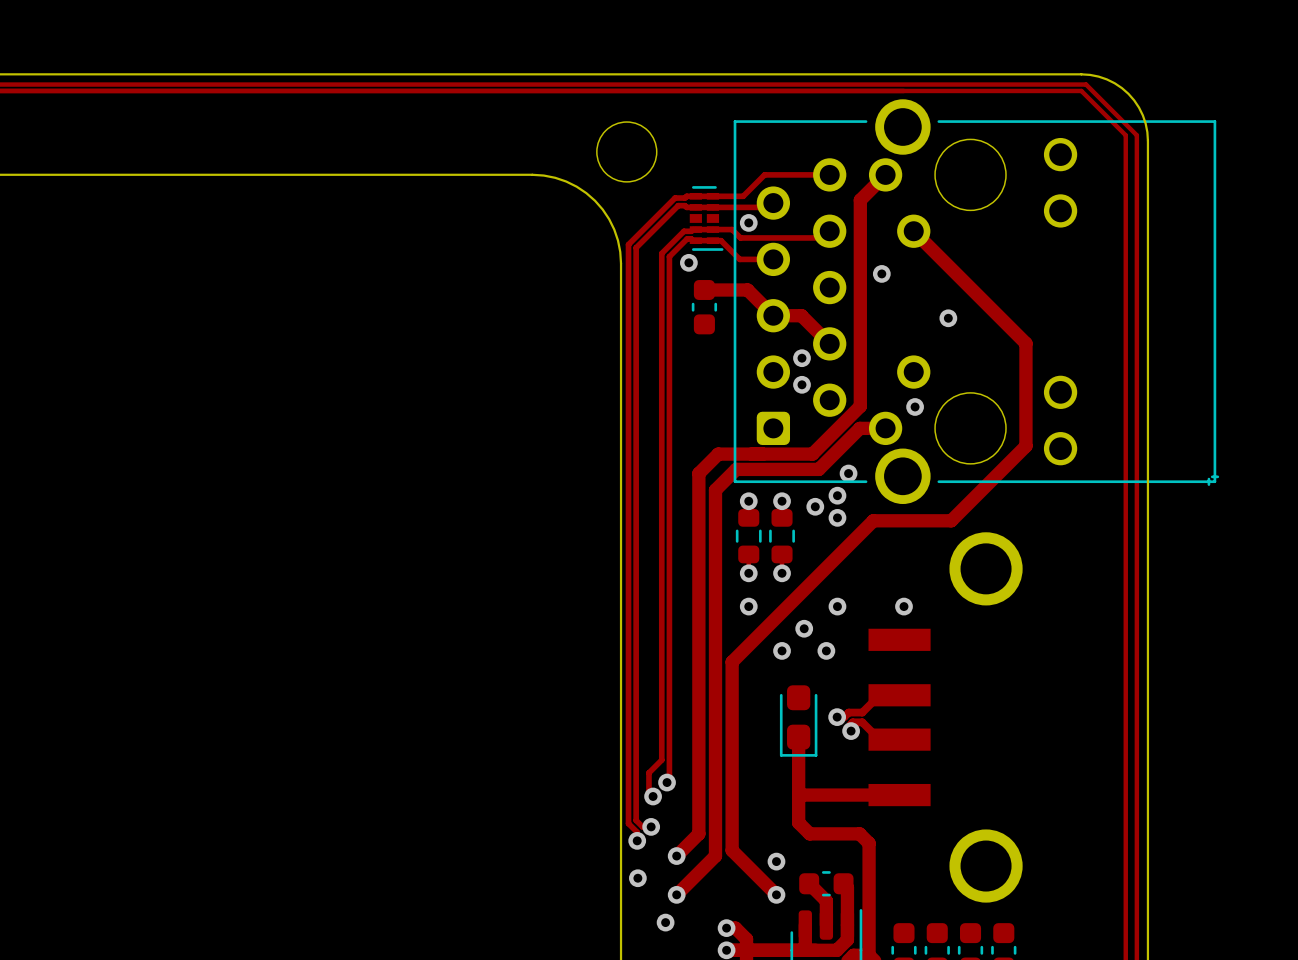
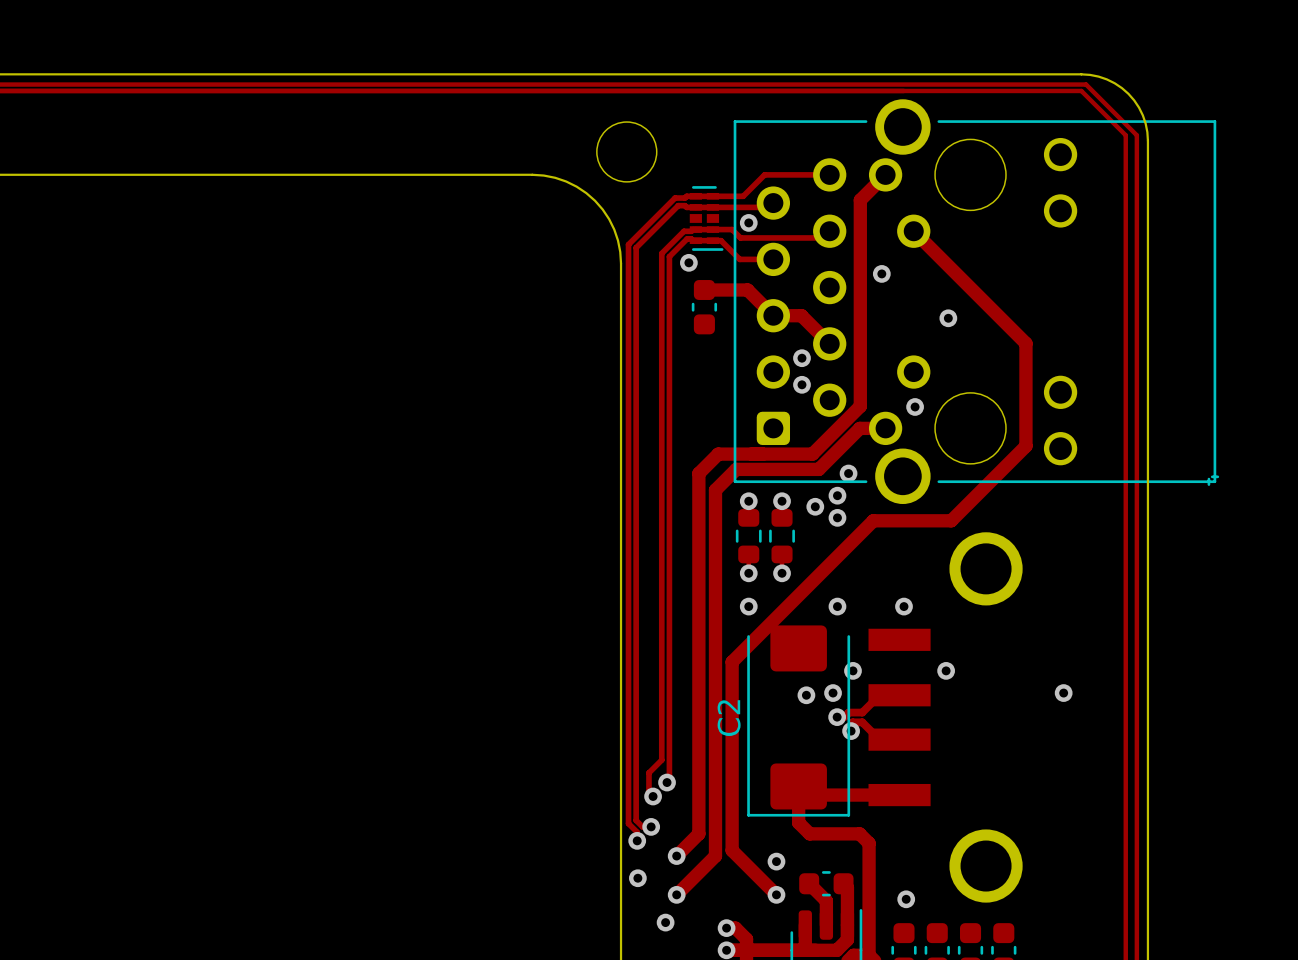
via: (804, 628) -> none
via: (782, 650) -> none
via: (826, 650) -> none
via: none -> (852, 670)
via: none -> (946, 670)
via: none -> (833, 693)
via: none -> (1063, 693)
via: none -> (806, 695)
part: (798, 720) -> none
C2: none -> (798, 720)
track: (798, 737) (798, 795) -> none
via: none -> (906, 899)

